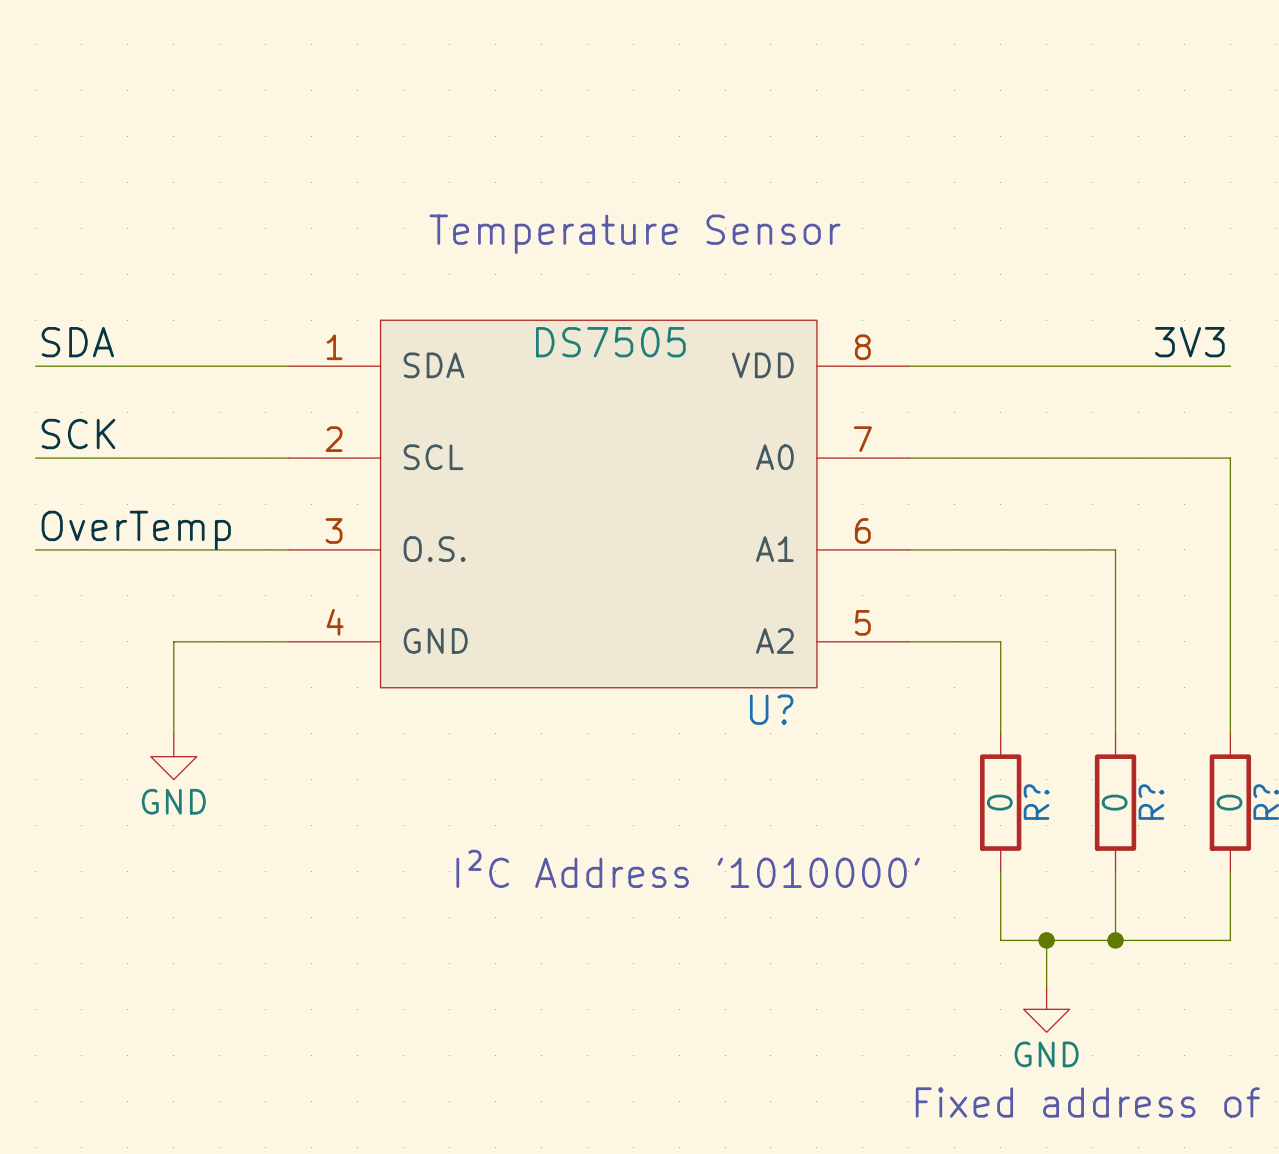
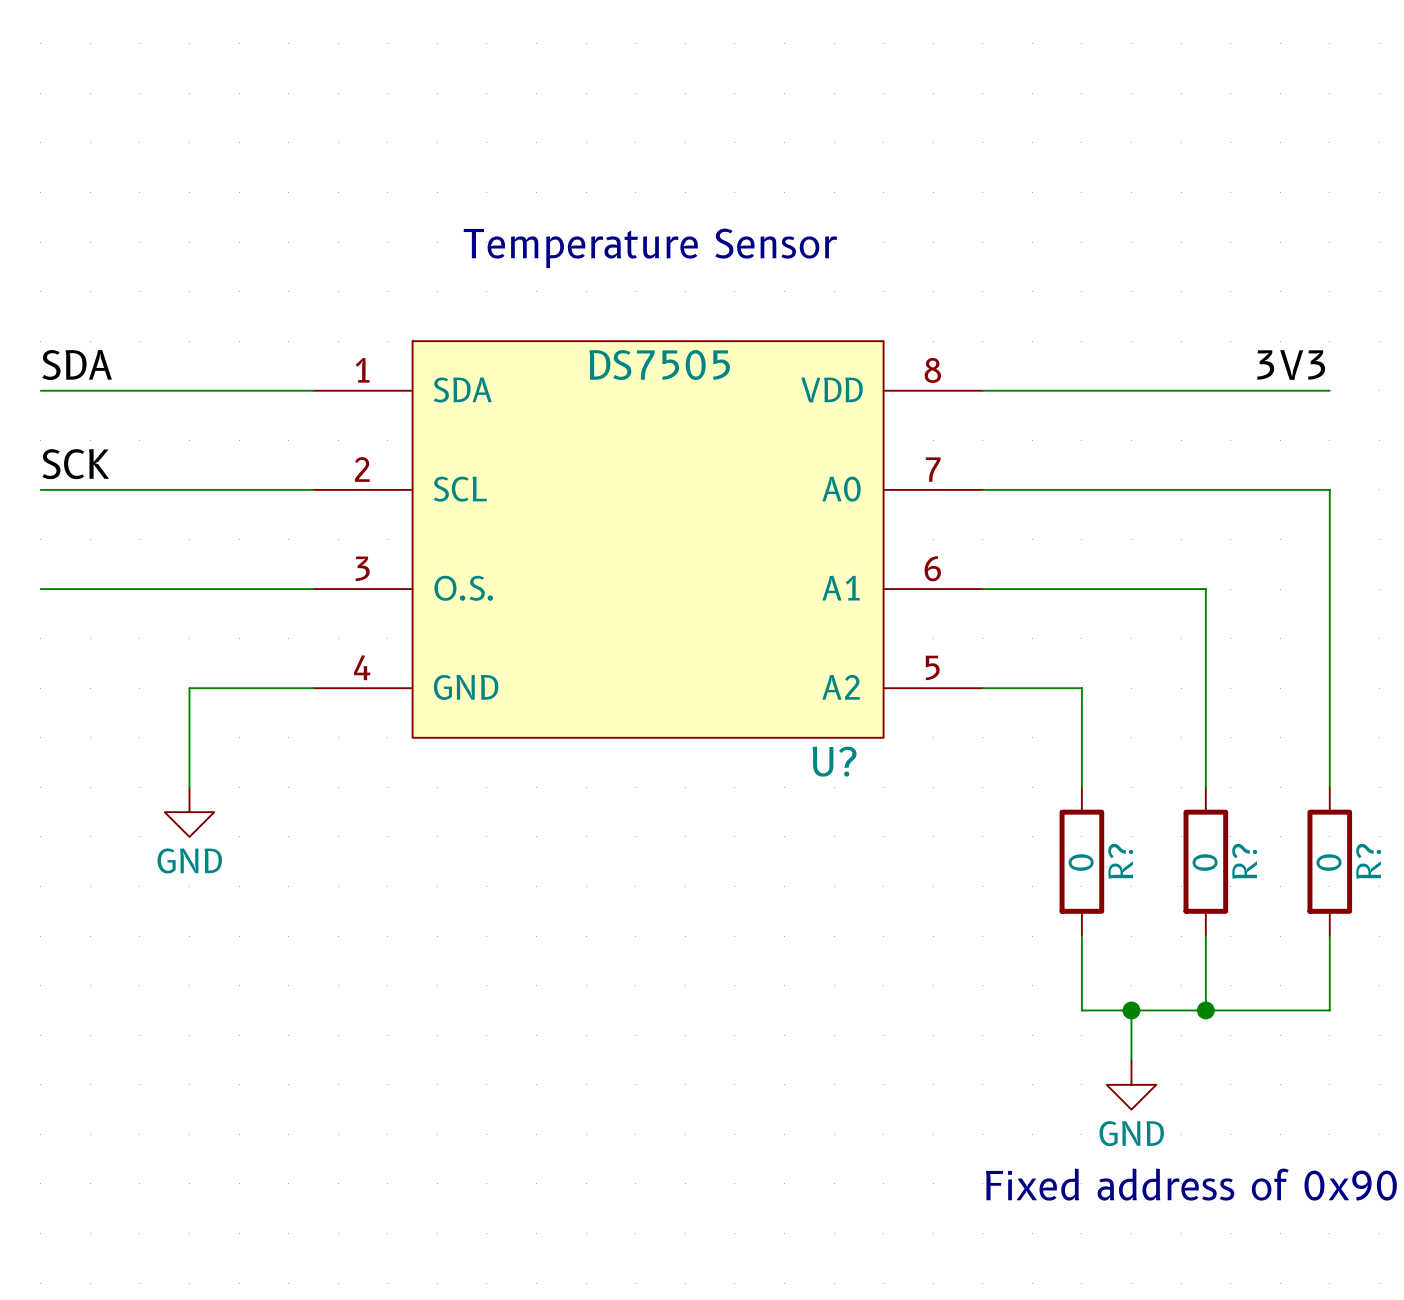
label: OverTemp (136, 530) -> none
text: I²C Address '1010000' (688, 868) -> none

